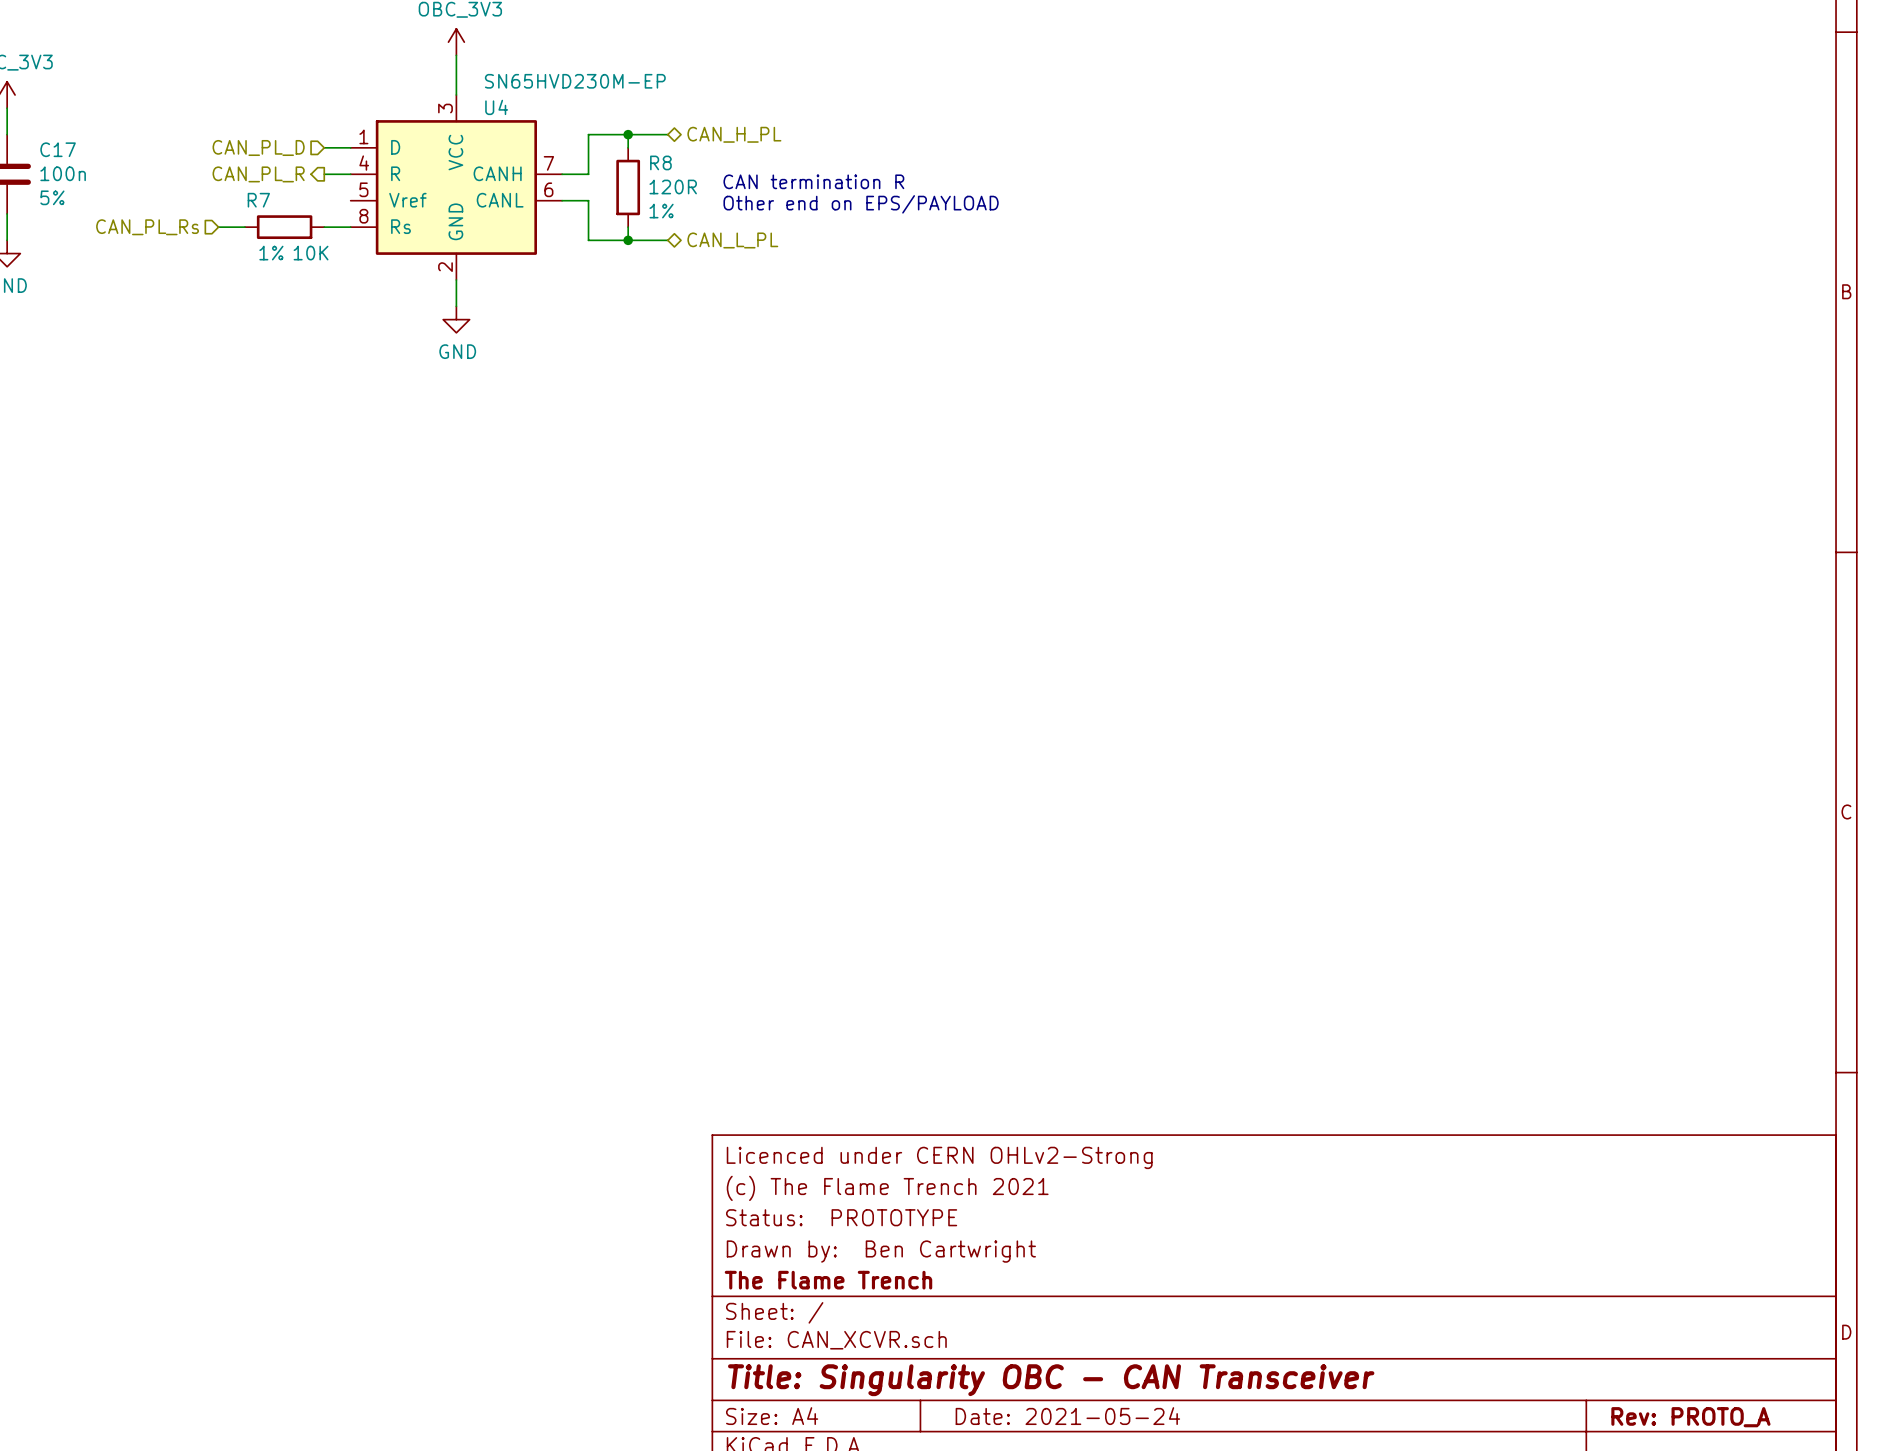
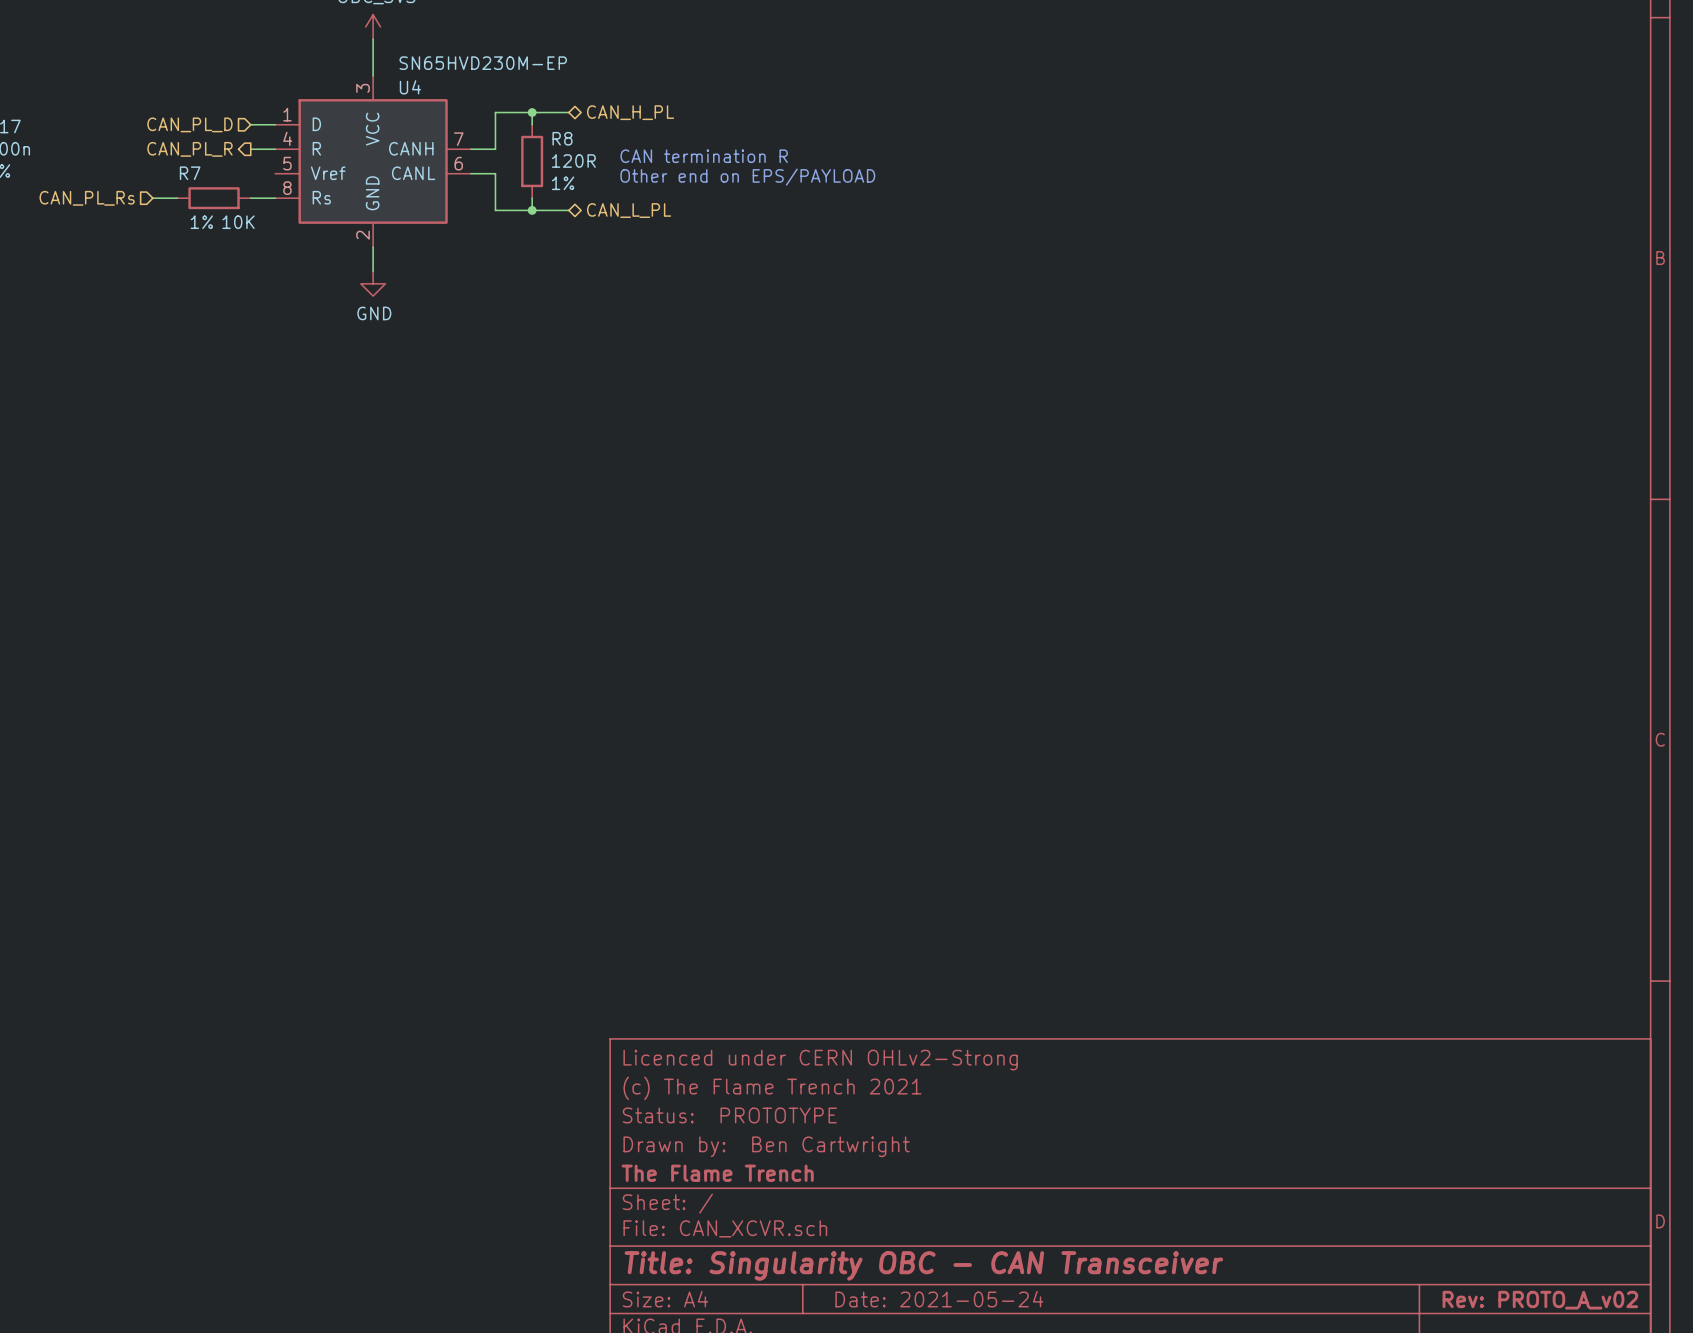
title block: Rev: PROTO_A (1690, 1417) -> Rev: PROTO_A_v02 (1540, 1300)

